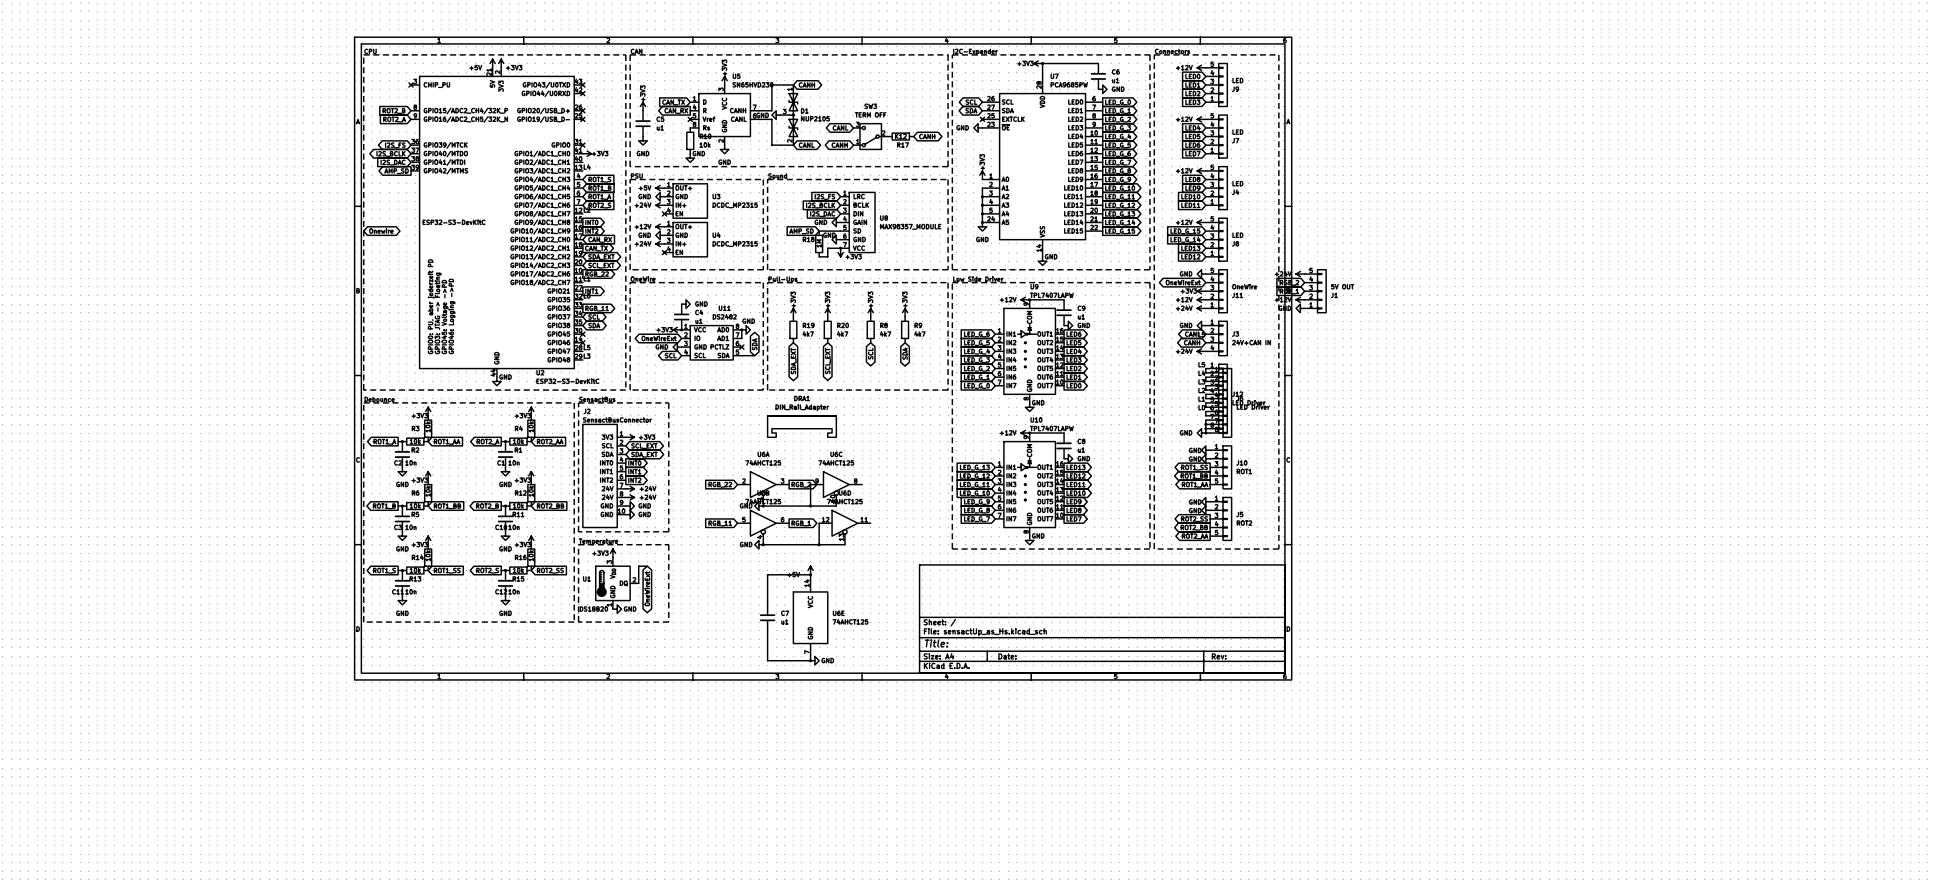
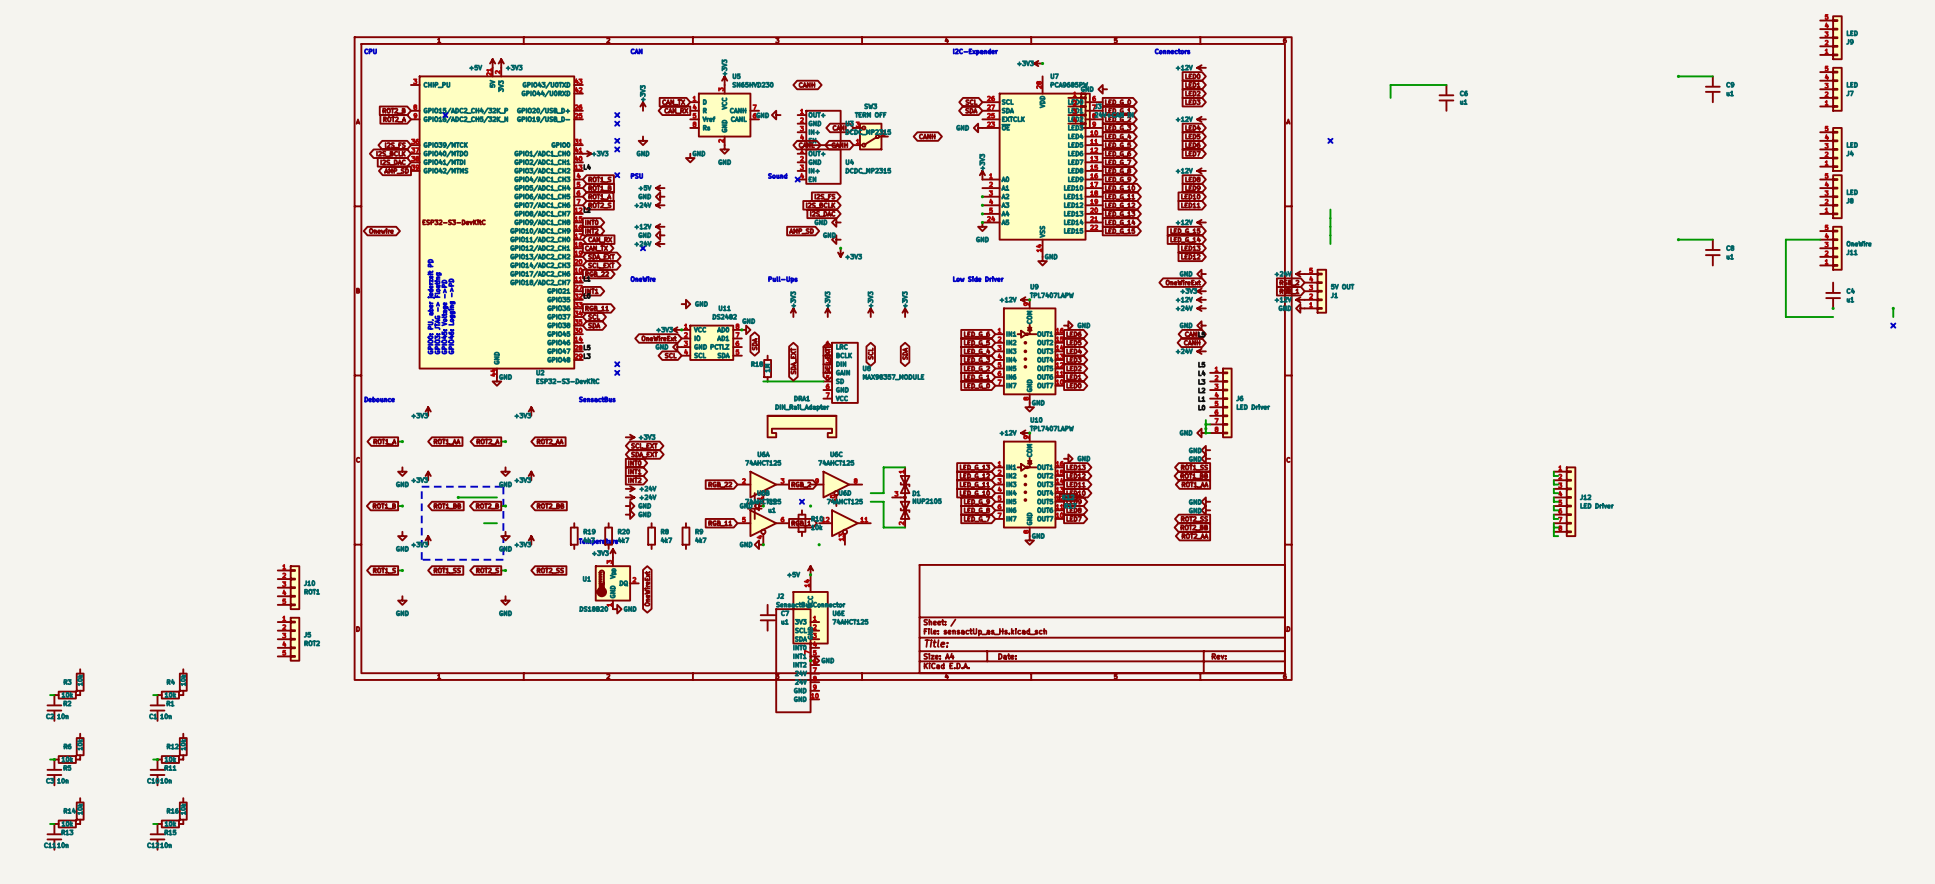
line: (363, 54) (625, 54) (625, 390) (363, 390) (363, 54) -> none
line: (630, 54) (948, 54) (948, 166) (630, 166) (630, 54) -> none
line: (952, 54) (1149, 54) (1149, 269) (952, 269) (952, 54) -> none
line: (1154, 54) (1278, 54) (1278, 549) (1154, 549) (1154, 54) -> none
wire: (1098, 63) (1042, 63) (1042, 76) -> none
part position: (1098, 76) -> (1446, 97)
wire: none -> (1678, 76) (1712, 76)
junction: none -> (1678, 76)
no-connect mark: (411, 84) -> none
no-connect mark: (582, 84) -> none
wire: (793, 84) (771, 84) (771, 110) (759, 110) -> none
part position: (1216, 84) -> (1831, 37)
wire: none -> (1446, 84) (1390, 84) (1390, 97)
power symbol rotation: 0° (1102, 89) -> 180° (1102, 89)
no-connect mark: (582, 93) -> none
no-connect mark: (582, 110) -> none
no-connect mark: none -> (445, 115)
no-connect mark: none -> (617, 115)
part position: (789, 115) -> (900, 497)
no-connect mark: (582, 119) -> none
no-connect mark: (690, 119) -> none
wire: (759, 119) (771, 119) (771, 145) (793, 145) -> none
no-connect mark: (982, 119) -> none
no-connect mark: none -> (617, 123)
part position: (643, 123) -> (754, 506)
part position: (900, 136) -> (1068, 497)
part position: (1216, 136) -> (1831, 89)
no-connect mark: none -> (617, 140)
part position: (690, 140) -> (801, 523)
no-connect mark: none -> (1330, 140)
no-connect mark: (582, 145) -> none
no-connect mark: none -> (617, 149)
no-connect mark: none -> (617, 175)
line: (630, 179) (630, 269) (763, 269) (763, 179) (630, 179) -> none
line: (767, 179) (948, 179) (948, 269) (767, 269) (767, 179) -> none
no-connect mark: none -> (797, 179)
wire: (982, 188) (982, 222) -> none
part position: (1216, 188) -> (1831, 149)
part position: (685, 201) -> (819, 127)
wire: none -> (1330, 209) (1330, 243)
no-connect mark: (664, 213) -> none
part position: (857, 222) -> (840, 372)
wire: (819, 231) (840, 231) -> none
part position: (685, 239) -> (819, 166)
part position: (1216, 239) -> (1831, 196)
wire: none -> (1678, 239) (1712, 239)
junction: none -> (1678, 239)
wire: none -> (1820, 239) (1785, 239) (1785, 317) (1833, 317)
part position: (819, 243) -> (767, 368)
no-connect mark: none -> (643, 248)
wire: (840, 248) (827, 248) (827, 256) (819, 256) -> none
no-connect mark: (664, 252) -> none
line: (630, 282) (630, 390) (763, 390) (763, 282) (630, 282) -> none
line: (767, 282) (767, 390) (948, 390) (948, 282) (767, 282) -> none
line: (952, 282) (1149, 282) (1149, 549) (952, 549) (952, 282) -> none
part position: (1216, 291) -> (1831, 248)
wire: (1029, 299) (1064, 299) -> none
junction: none -> (1833, 308)
wire: none -> (1893, 308) (1893, 317)
junction: none -> (1893, 308)
part position: (1064, 312) -> (1712, 89)
part position: (681, 317) -> (1833, 295)
no-connect mark: none -> (1893, 325)
wire: (741, 329) (741, 338) -> none
part position: (793, 329) -> (574, 536)
part position: (827, 329) -> (608, 536)
part position: (870, 329) -> (651, 536)
part position: (905, 329) -> (685, 536)
no-connect mark: (582, 334) -> none
part position: (1216, 338) -> (1079, 110)
no-connect mark: (582, 342) -> none
no-connect mark: (741, 347) -> none
wire: (741, 355) (754, 355) -> none
no-connect mark: none -> (617, 364)
wire: (1205, 368) (1205, 372) (1210, 372) -> none
no-connect mark: none -> (617, 372)
wire: (1205, 377) (1205, 381) (1210, 381) -> none
wire: none -> (763, 381) (823, 381)
wire: (1205, 385) (1205, 390) (1210, 390) -> none
wire: (1205, 394) (1205, 398) (1210, 398) -> none
part position: (1216, 398) -> (1564, 501)
line: (363, 402) (363, 622) (574, 622) (574, 402) (363, 402) -> none
line: (578, 402) (578, 531) (668, 531) (668, 402) (578, 402) -> none
wire: (1205, 402) (1205, 407) (1210, 407) -> none
wire: (1205, 411) (1205, 415) (1210, 415) -> none
part position: (428, 428) -> (80, 682)
part position: (531, 428) -> (183, 682)
wire: (1029, 433) (1064, 433) -> none
part position: (415, 441) -> (67, 695)
part position: (518, 441) -> (170, 695)
part position: (1064, 445) -> (1712, 252)
part position: (402, 454) -> (54, 707)
part position: (505, 454) -> (157, 707)
wire: none -> (905, 467) (883, 467) (883, 493) (870, 493)
part position: (1221, 467) -> (288, 587)
wire: none -> (1553, 471) (1553, 475) (1558, 475)
part position: (604, 475) -> (797, 660)
wire: none -> (1553, 480) (1553, 484) (1558, 484)
wire: (810, 484) (810, 506) -> none
line: none -> (421, 486) (503, 486) (503, 559) (421, 559) (421, 486)
wire: none -> (1553, 488) (1553, 493) (1558, 493)
part position: (428, 493) -> (80, 746)
part position: (531, 493) -> (183, 746)
wire: none -> (458, 497) (496, 497)
junction: none -> (458, 497)
wire: none -> (1553, 497) (1553, 501) (1558, 501)
no-connect mark: none -> (801, 501)
wire: none -> (870, 501) (883, 501) (883, 527) (905, 527)
part position: (415, 506) -> (67, 759)
part position: (518, 506) -> (170, 759)
wire: (763, 506) (836, 506) -> none
wire: none -> (1553, 506) (1553, 510) (1558, 510)
wire: none -> (1553, 514) (1553, 518) (1558, 518)
part position: (402, 518) -> (54, 772)
part position: (505, 518) -> (157, 772)
part position: (1221, 518) -> (288, 639)
wire: none -> (484, 523) (496, 523)
wire: (819, 523) (819, 544) -> none
wire: none -> (1553, 523) (1553, 536) (1558, 536)
wire: none -> (1553, 527) (1558, 527)
line: (578, 544) (668, 544) (668, 622) (578, 622) (578, 544) -> none
wire: (763, 544) (844, 544) -> none
part position: (428, 557) -> (80, 811)
part position: (531, 557) -> (183, 811)
wire: (647, 566) (638, 566) (638, 583) -> none
part position: (415, 570) -> (67, 823)
part position: (518, 570) -> (170, 823)
wire: (810, 574) (767, 574) (767, 604) -> none
part position: (402, 583) -> (54, 836)
part position: (505, 583) -> (157, 836)
wire: (767, 630) (767, 660) (810, 660) -> none
wire: none -> (50, 695) (54, 695)
wire: none -> (153, 695) (157, 695)
wire: none -> (50, 759) (54, 759)
junction: none -> (54, 759)
wire: none -> (153, 759) (157, 759)
junction: none -> (157, 759)
wire: none -> (50, 823) (54, 823)
wire: none -> (153, 823) (157, 823)

